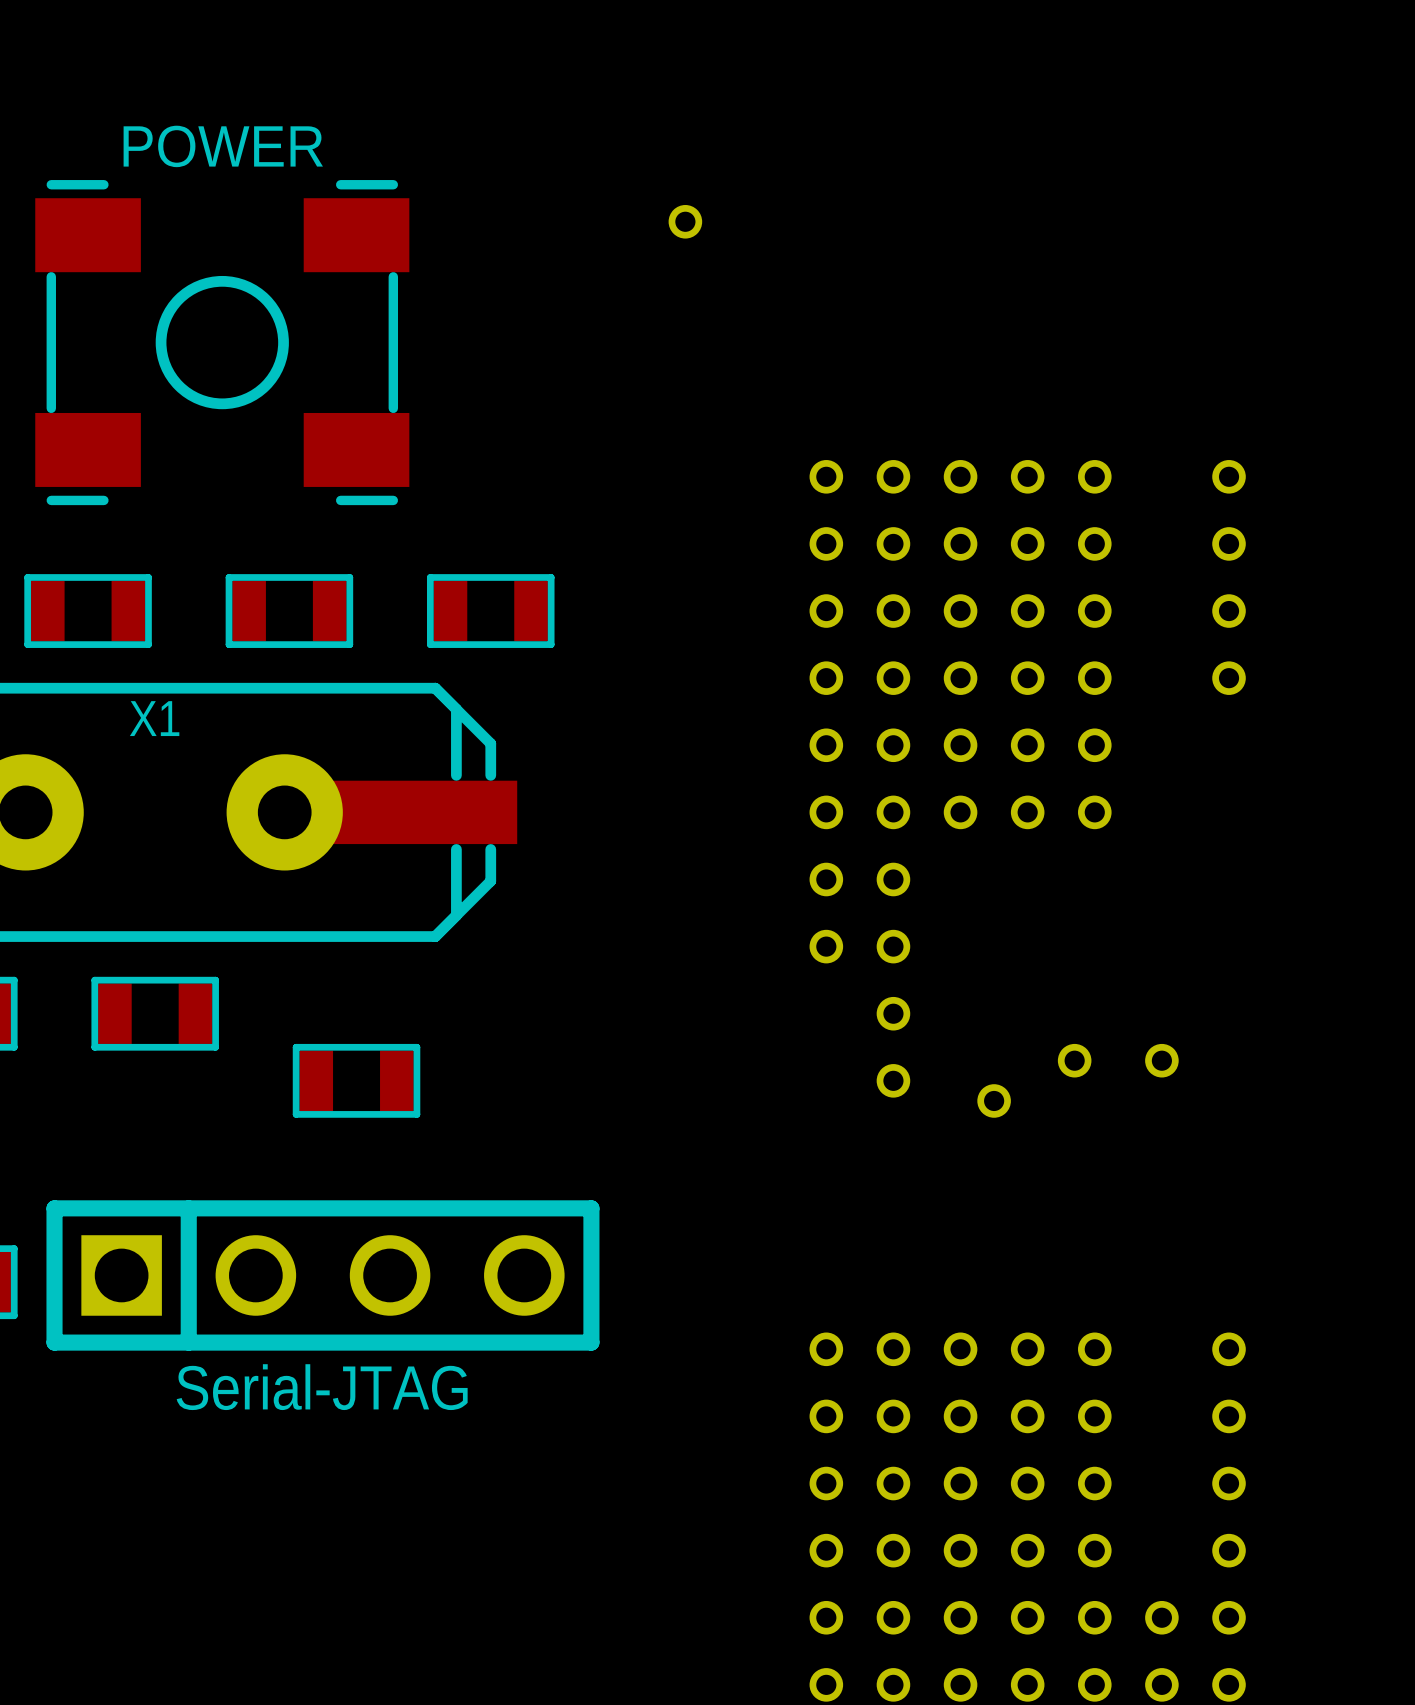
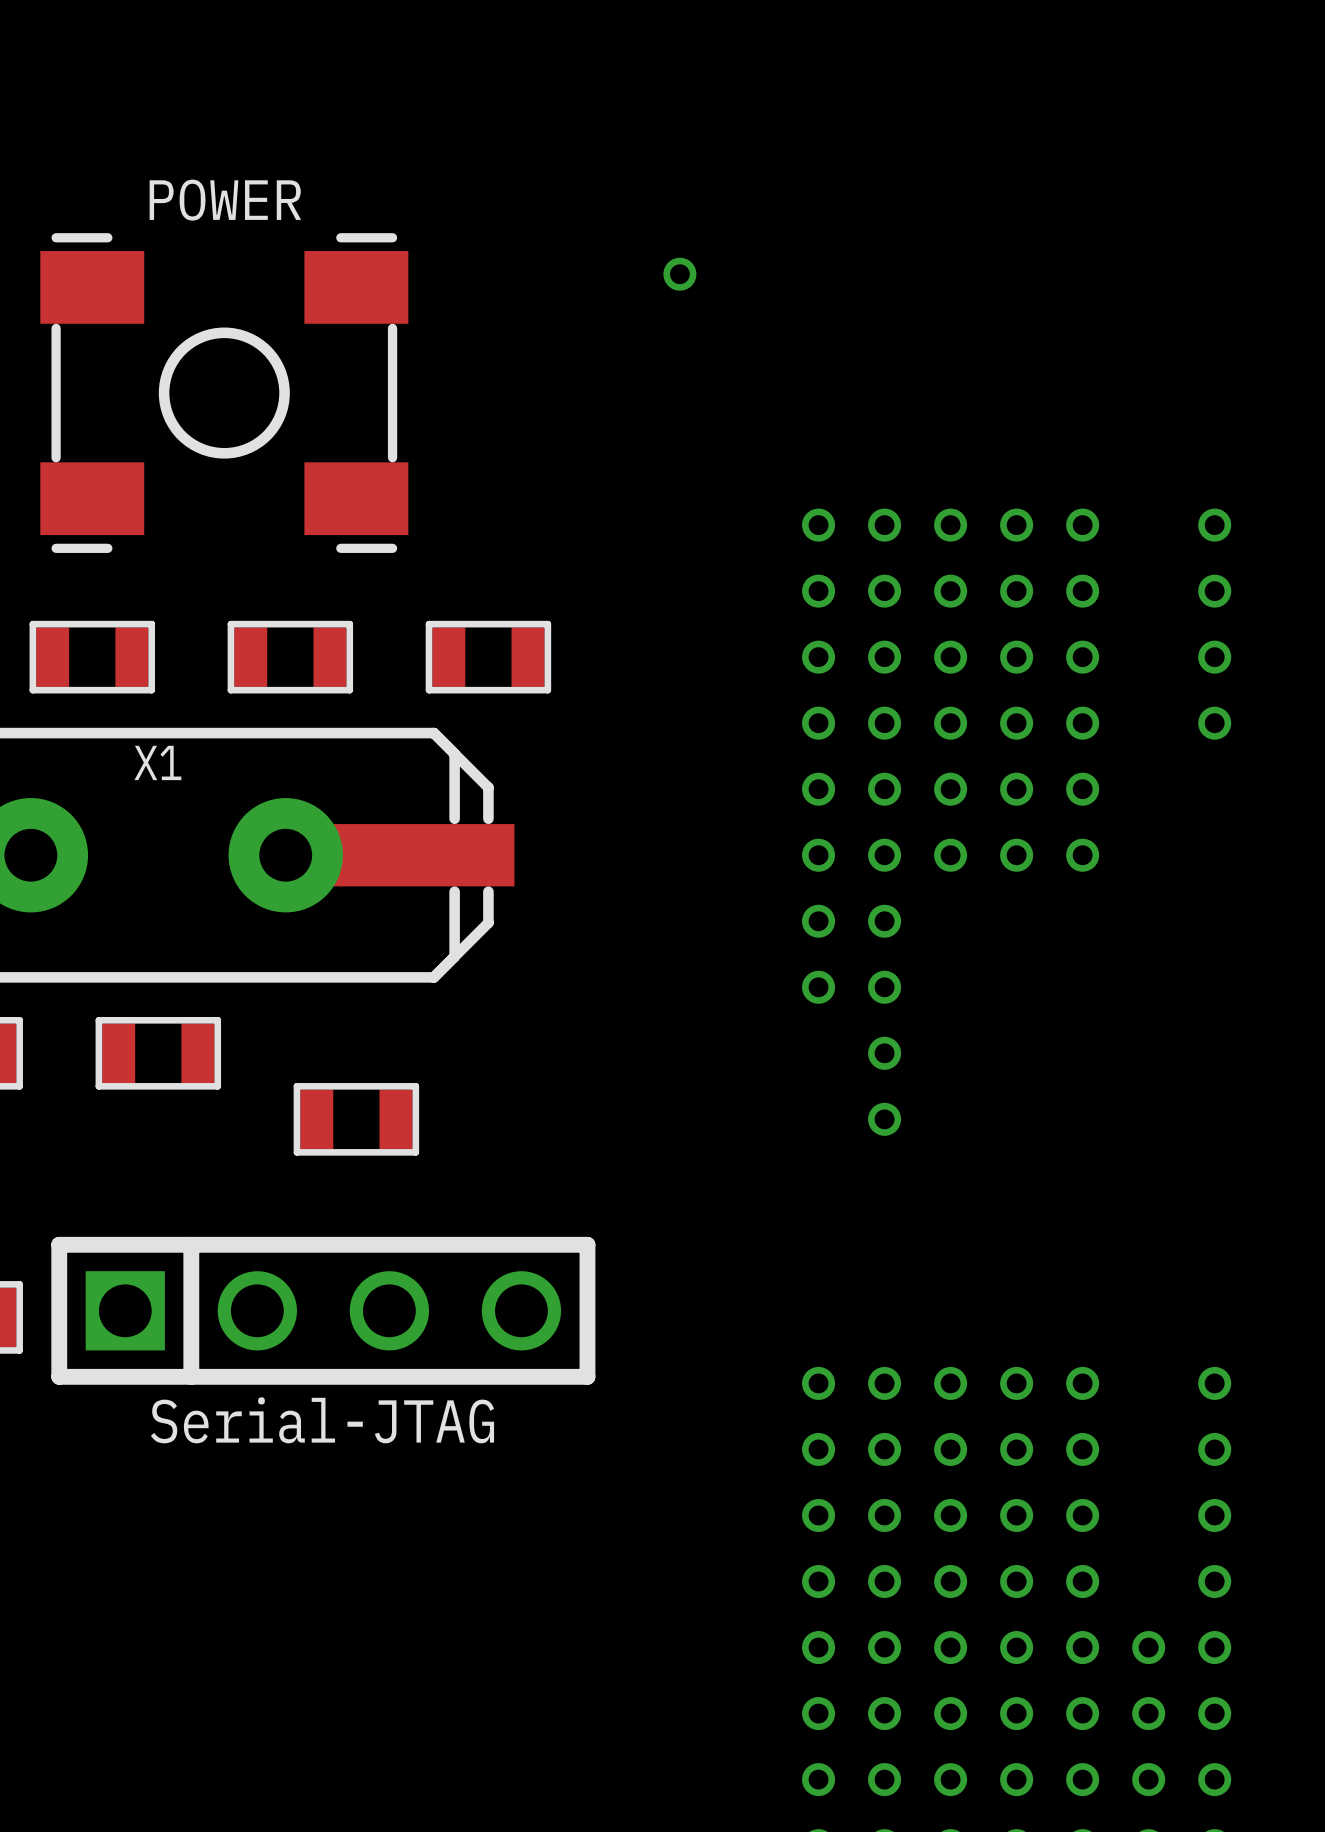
part: (1074, 1060) -> none
part: (1161, 1060) -> none
part: (994, 1100) -> none

